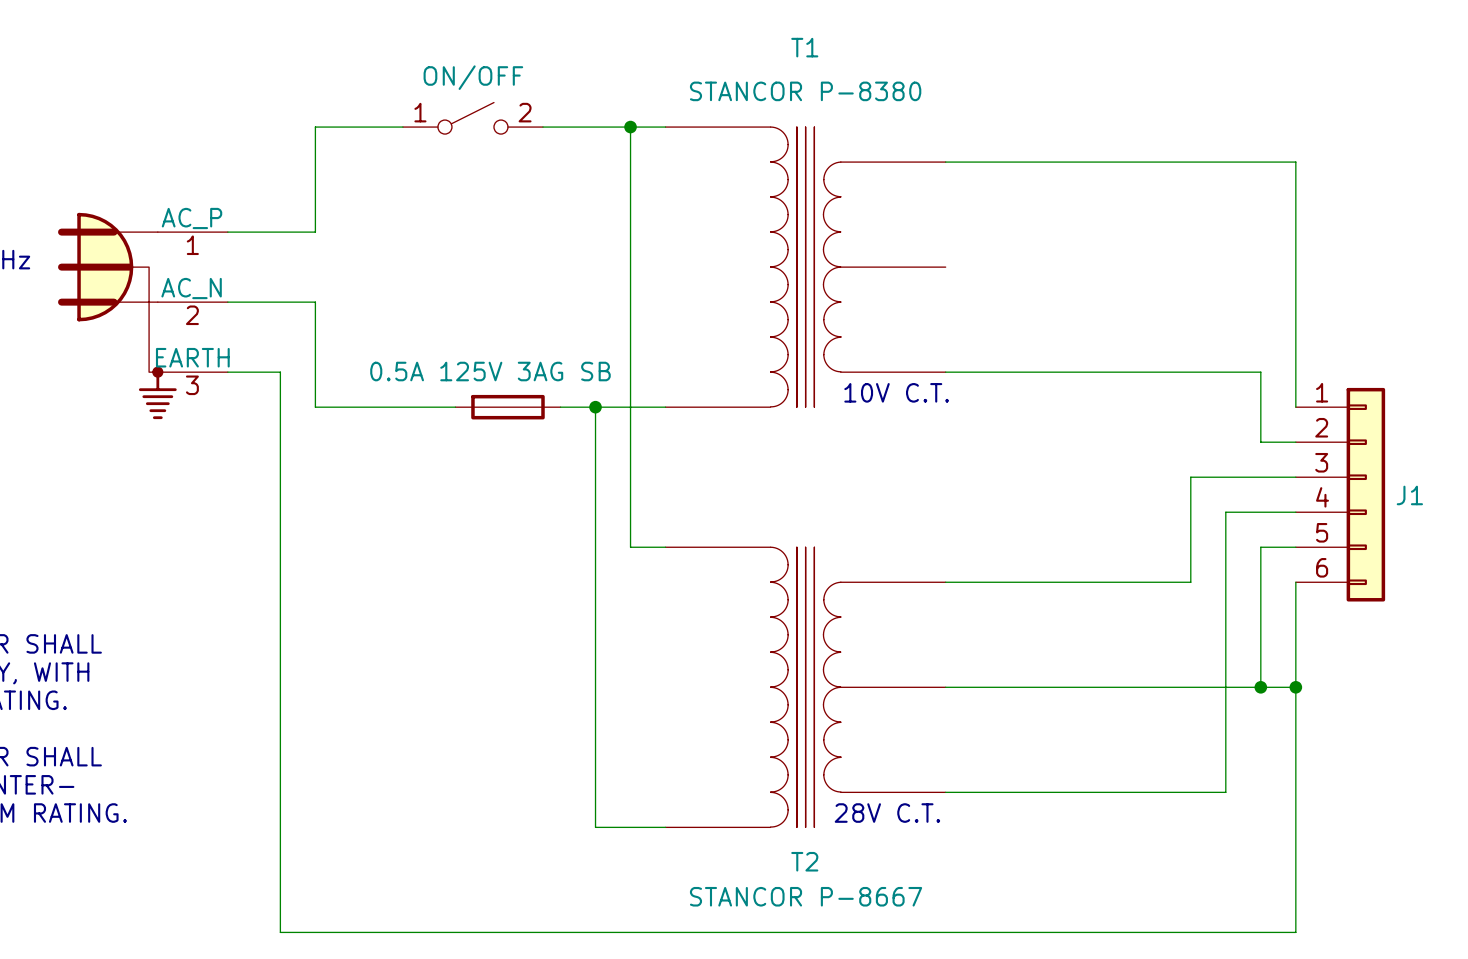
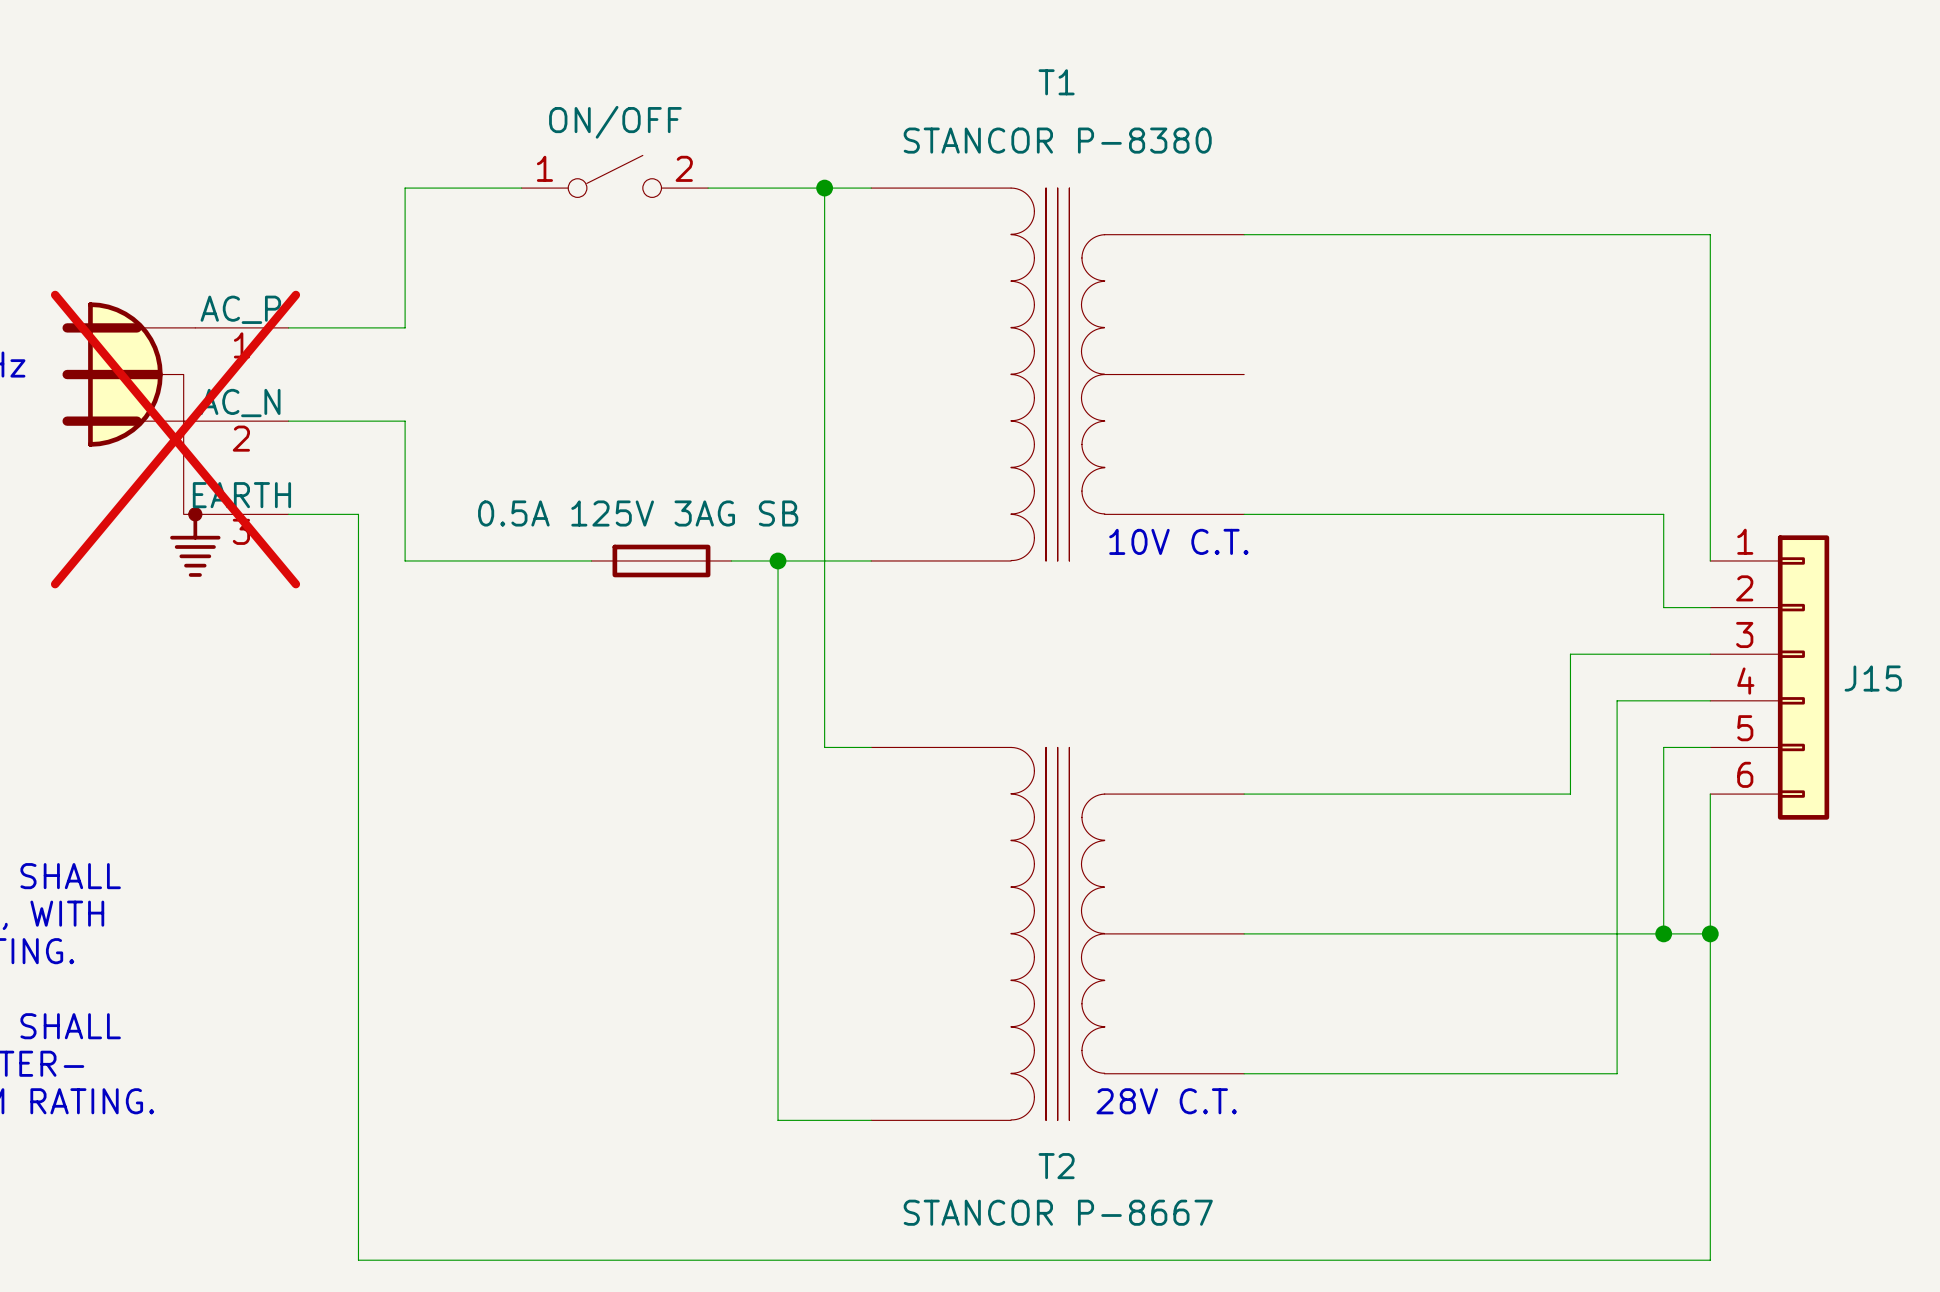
part do-not-place cross: none -> (175, 439)
J1 name: J1 (1409, 495) -> J15 (1873, 678)

